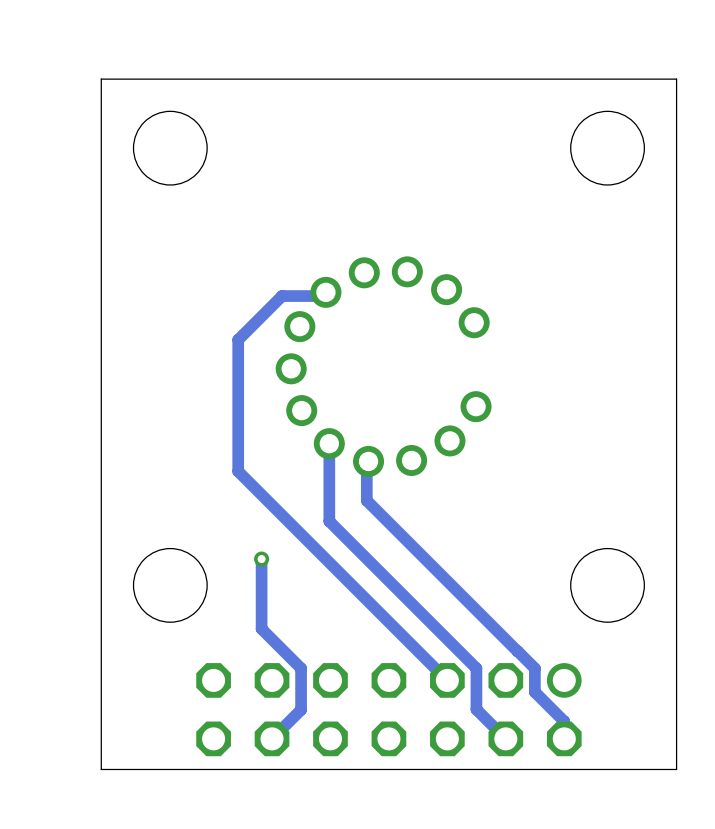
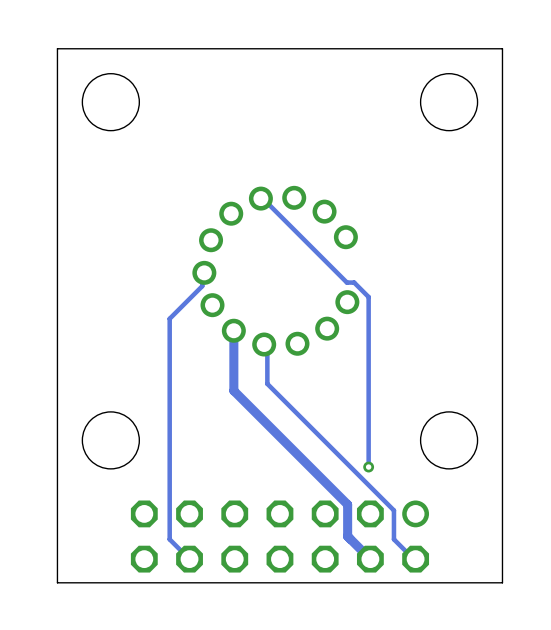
track: none -> (260, 198) (346, 282) (354, 282) (368, 297) (368, 467)
track: (325, 292) (325, 296) (282, 296) (238, 339) (238, 471) (447, 680) -> none
track: (368, 461) (366, 463) (366, 500) (517, 651) -> (264, 344) (267, 347) (267, 383) (393, 510) (393, 539) (415, 559)
track: (261, 559) (261, 628) (301, 668) (301, 709) (272, 738) -> (204, 272) (202, 275) (202, 286) (169, 318) (169, 539) (189, 559)
via: (261, 559) -> none
via: none -> (368, 467)
track: (517, 651) (534, 668) (534, 692) (564, 721) (564, 738) -> none

